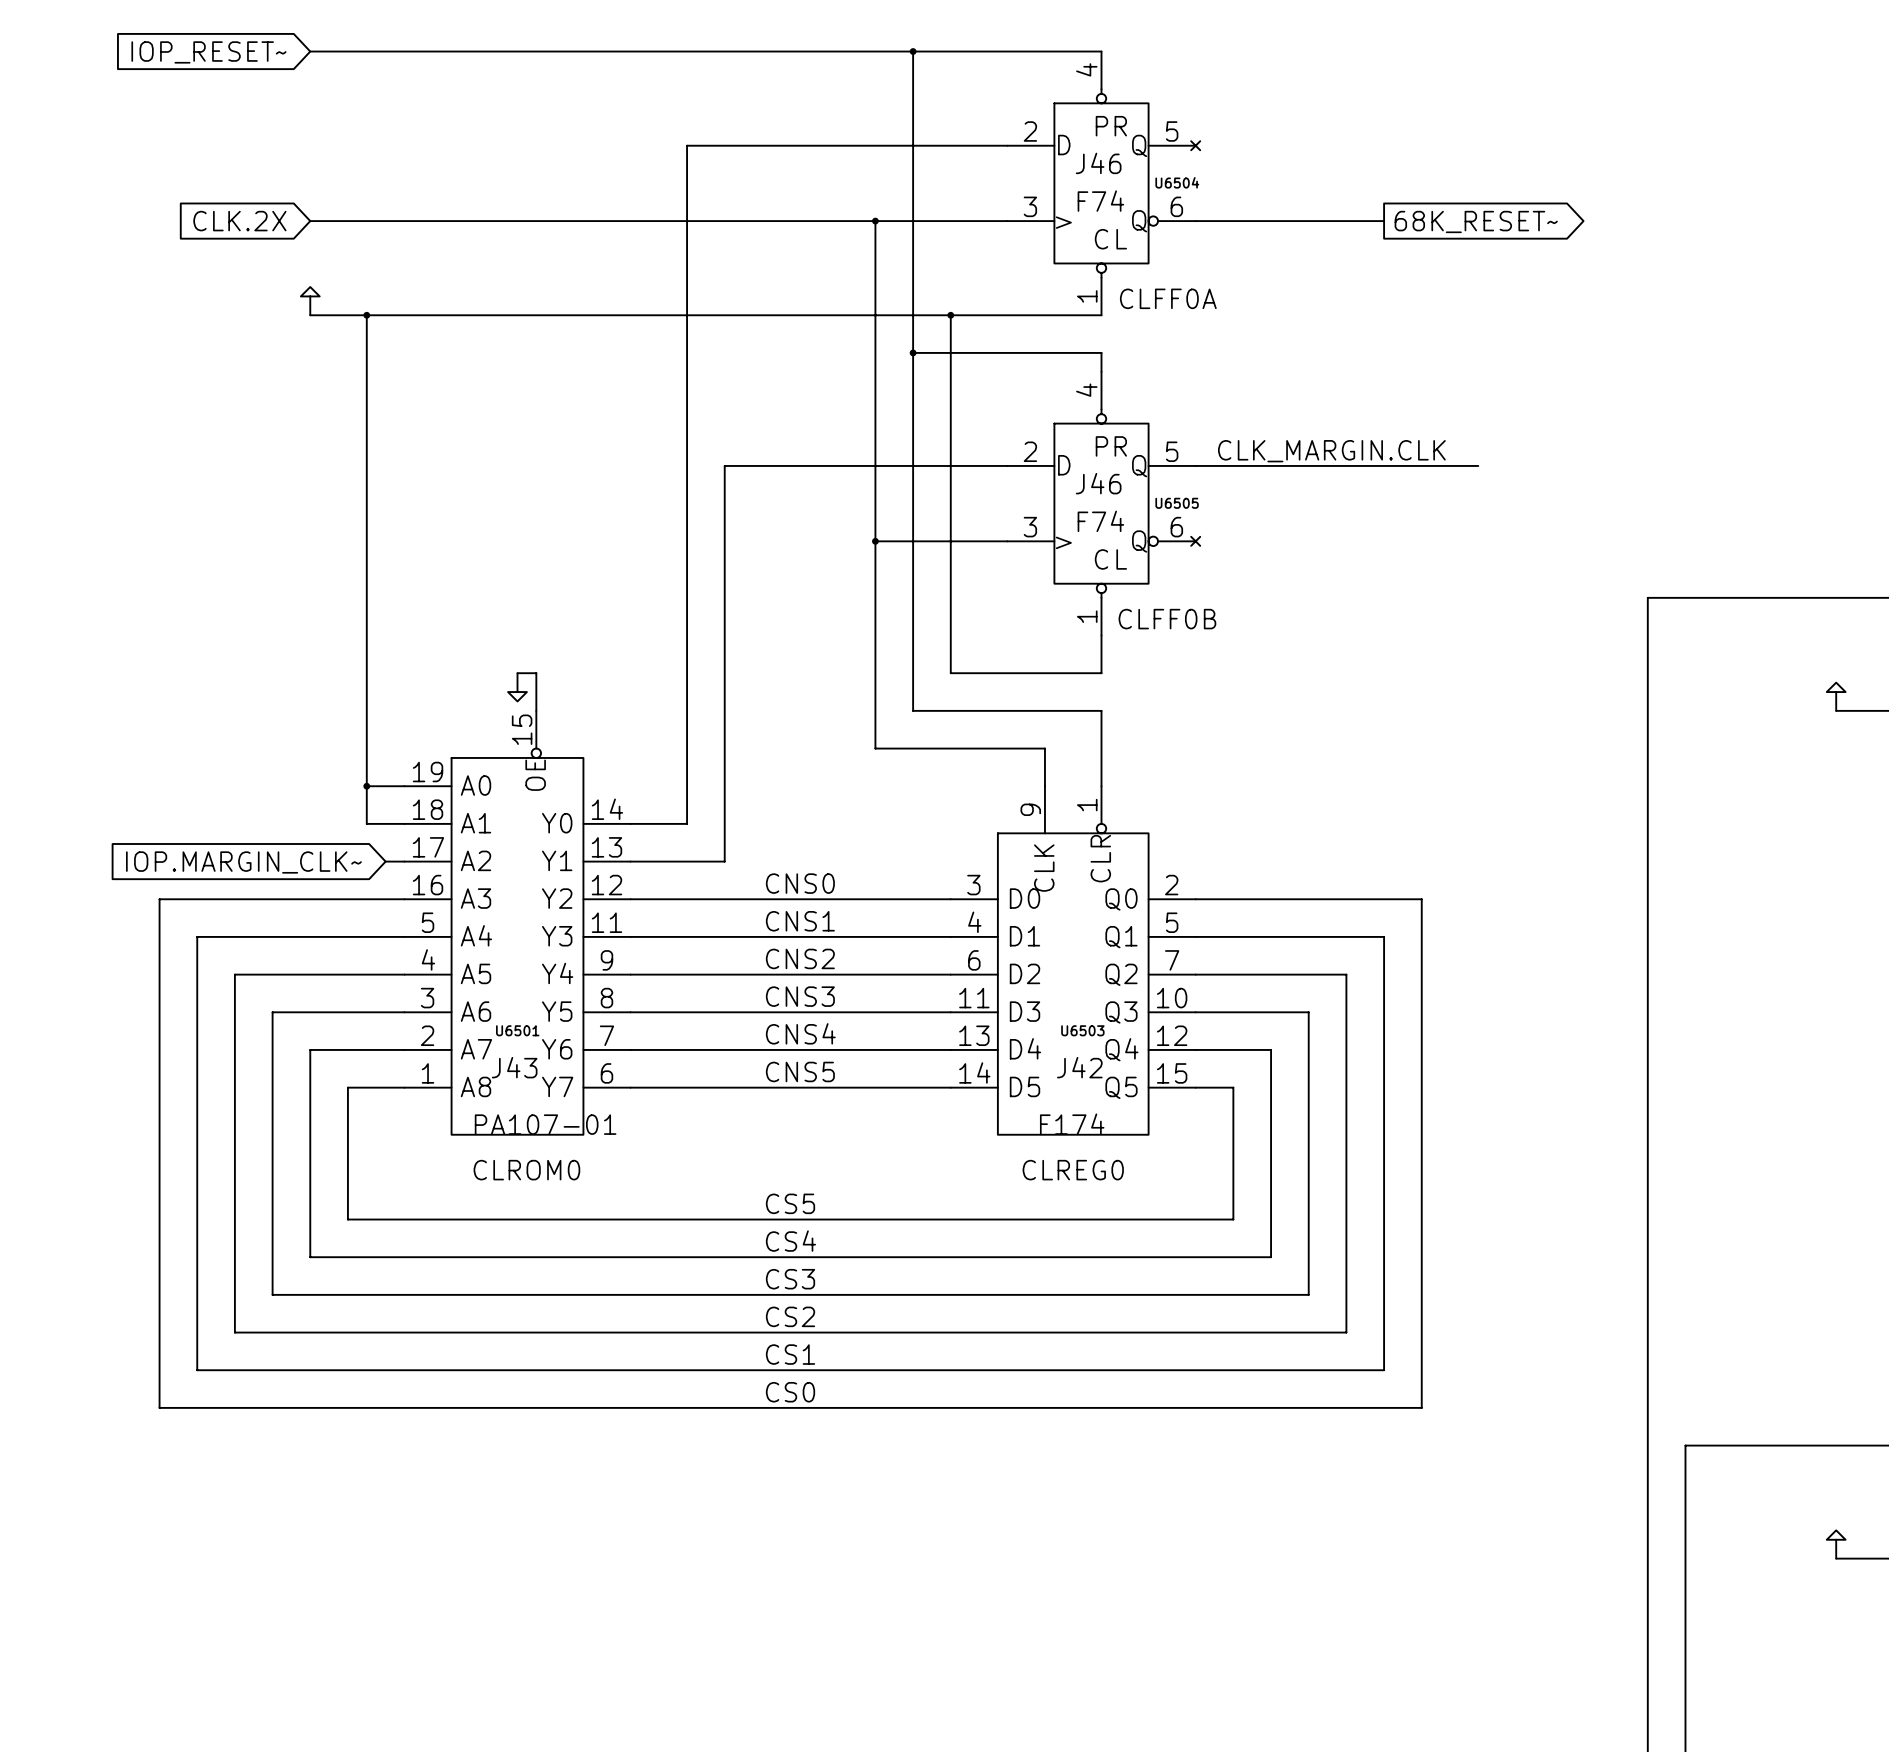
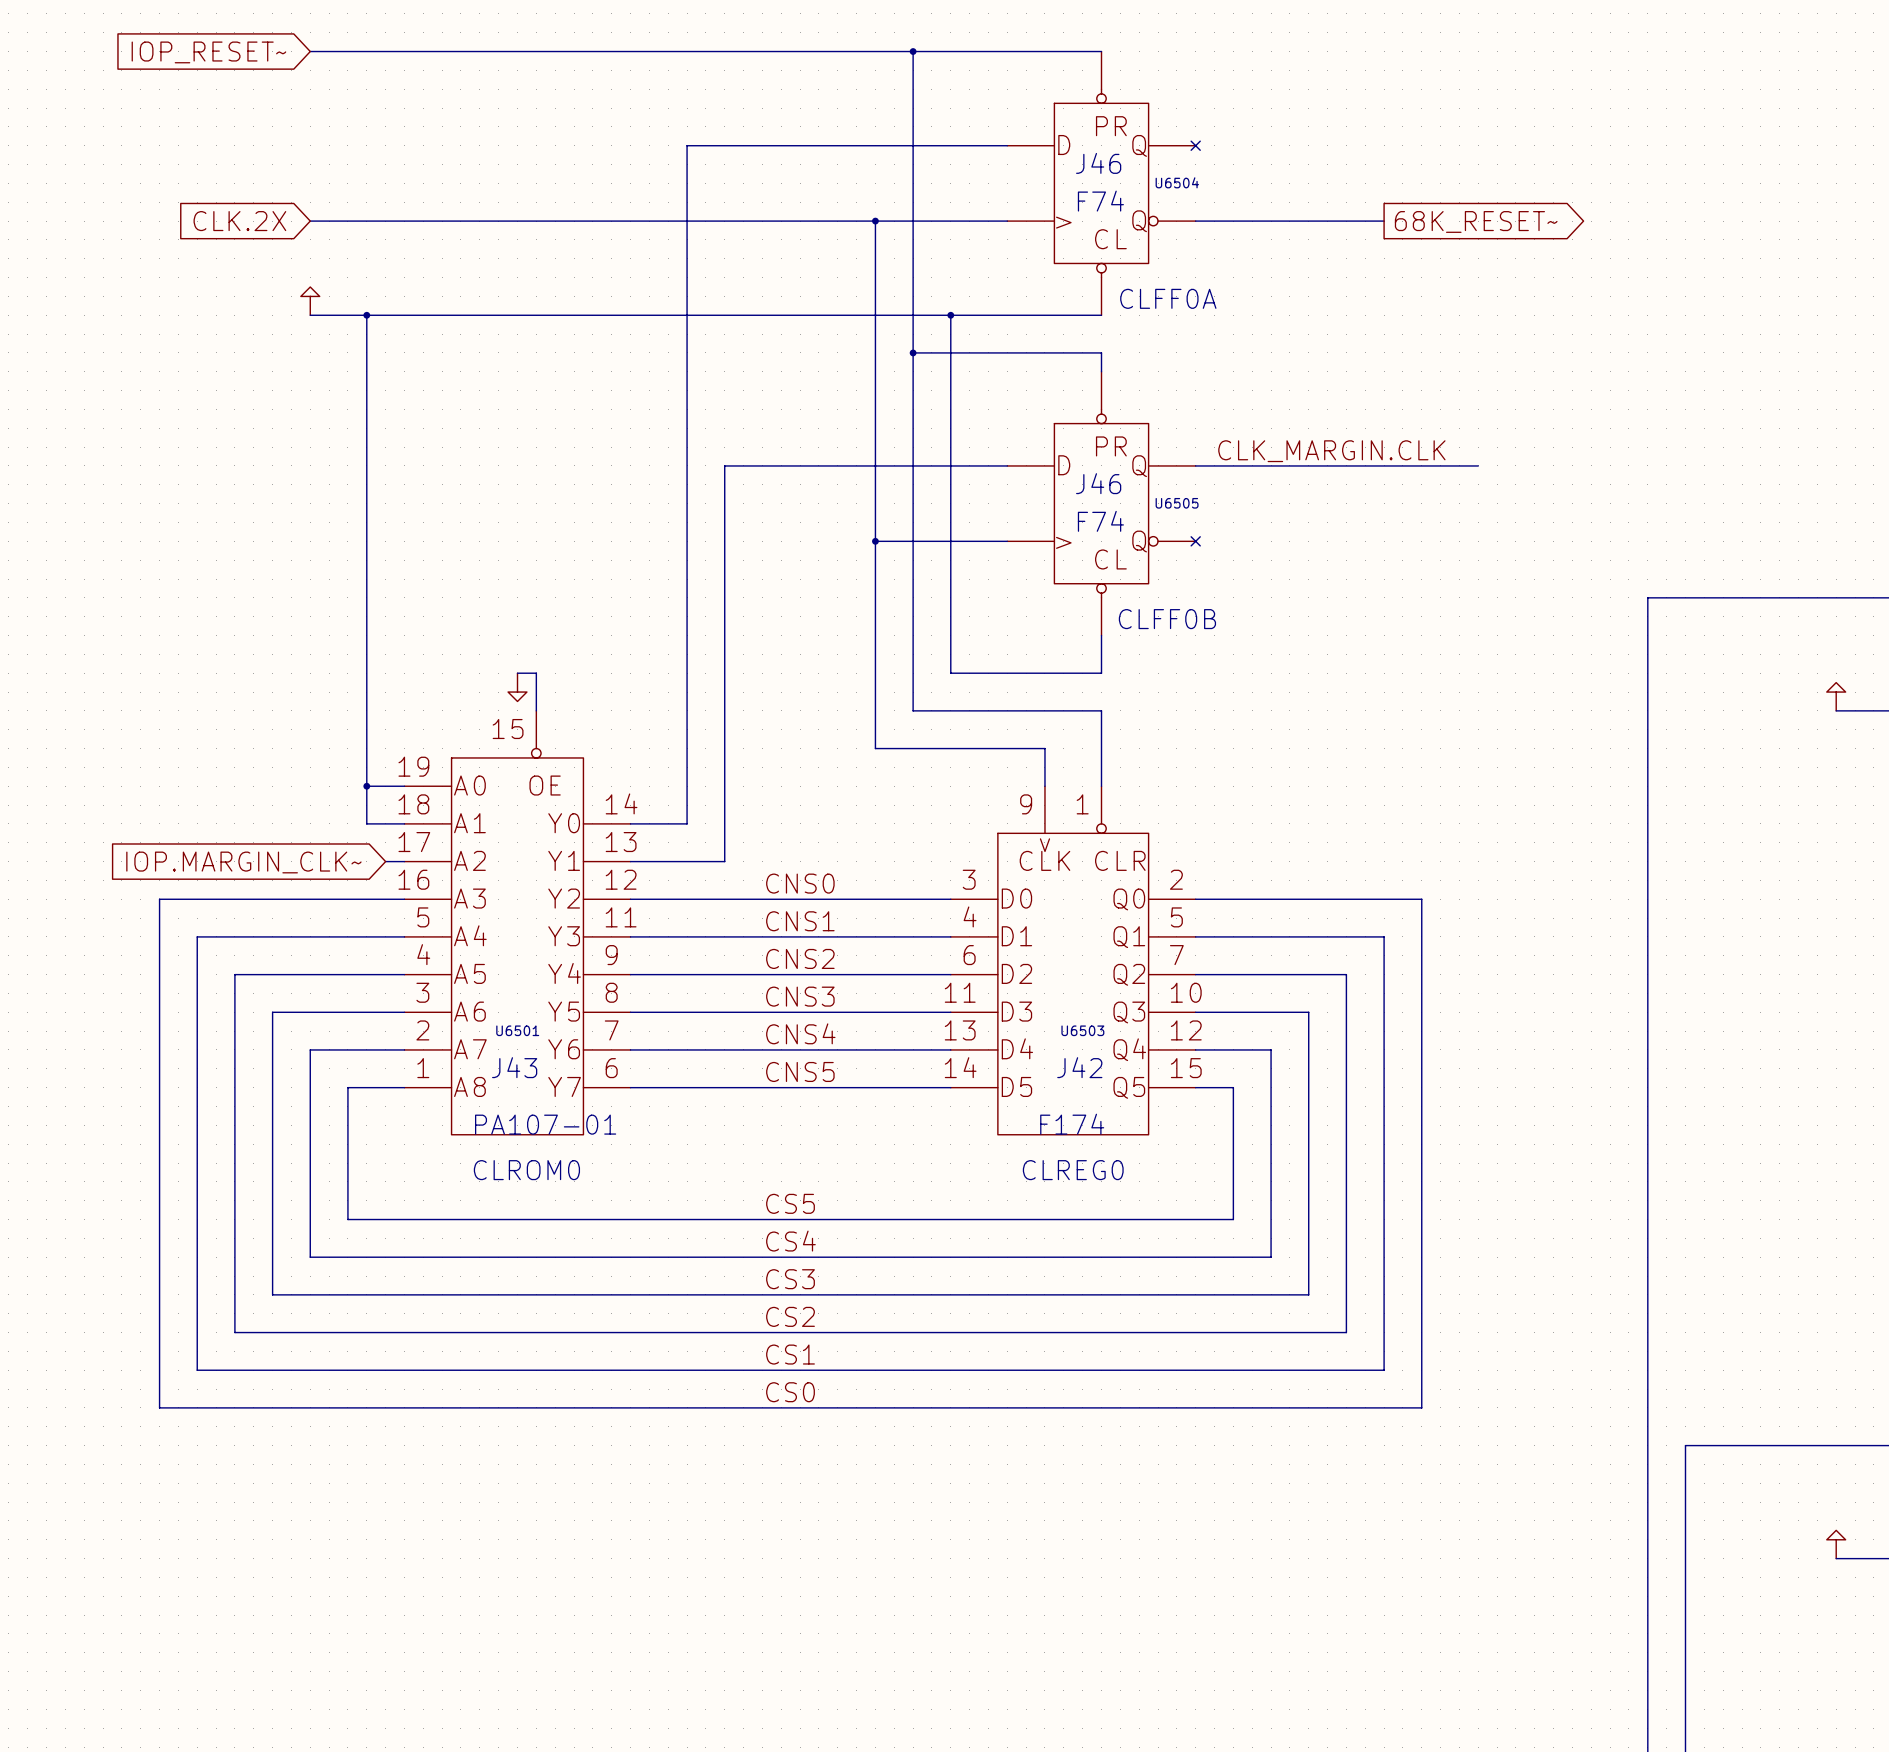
U6504 pin number: 4 (1086, 69) -> none
U6504 pin number: 2 (1030, 131) -> none
U6504 pin number: 5 (1172, 131) -> none
U6504 pin number: 3 (1030, 206) -> none
U6504 pin number: 6 (1176, 206) -> none
U6504 pin number: 1 (1087, 296) -> none
U6505 pin number: 4 (1086, 390) -> none
U6505 pin number: 2 (1030, 451) -> none
U6505 pin number: 5 (1172, 451) -> none
U6505 pin number: 3 (1030, 527) -> none
U6505 pin number: 6 (1176, 527) -> none
U6505 pin number: 1 (1087, 616) -> none
U6501 symbol: [404, 710, 631, 1135] -> [404, 710, 631, 1135]
U6503 symbol: [950, 786, 1196, 1135] -> [950, 786, 1196, 1135]

